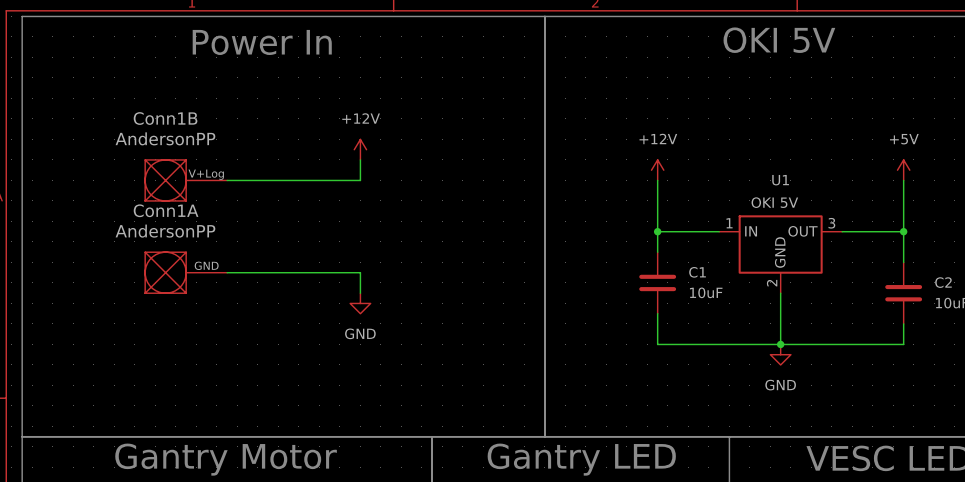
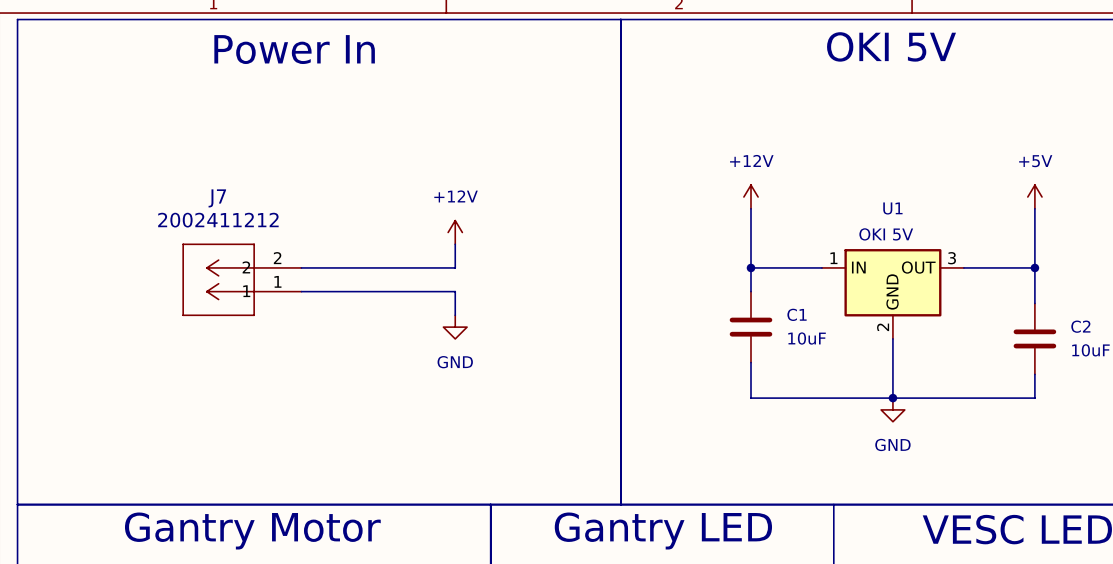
power symbol position: +12V (360, 149) -> +12V (455, 232)
wire: (360, 159) (360, 180) (227, 180) -> (455, 244) (455, 267) (301, 267)
Conn1B: AndersonPP (186, 180) -> none
J7: none -> 2002411212 (242, 279)
Conn1A: AndersonPP (186, 272) -> none
wire: (227, 272) (360, 272) (360, 293) -> (301, 291) (455, 291) (455, 315)
power symbol position: GND (360, 303) -> GND (455, 327)

